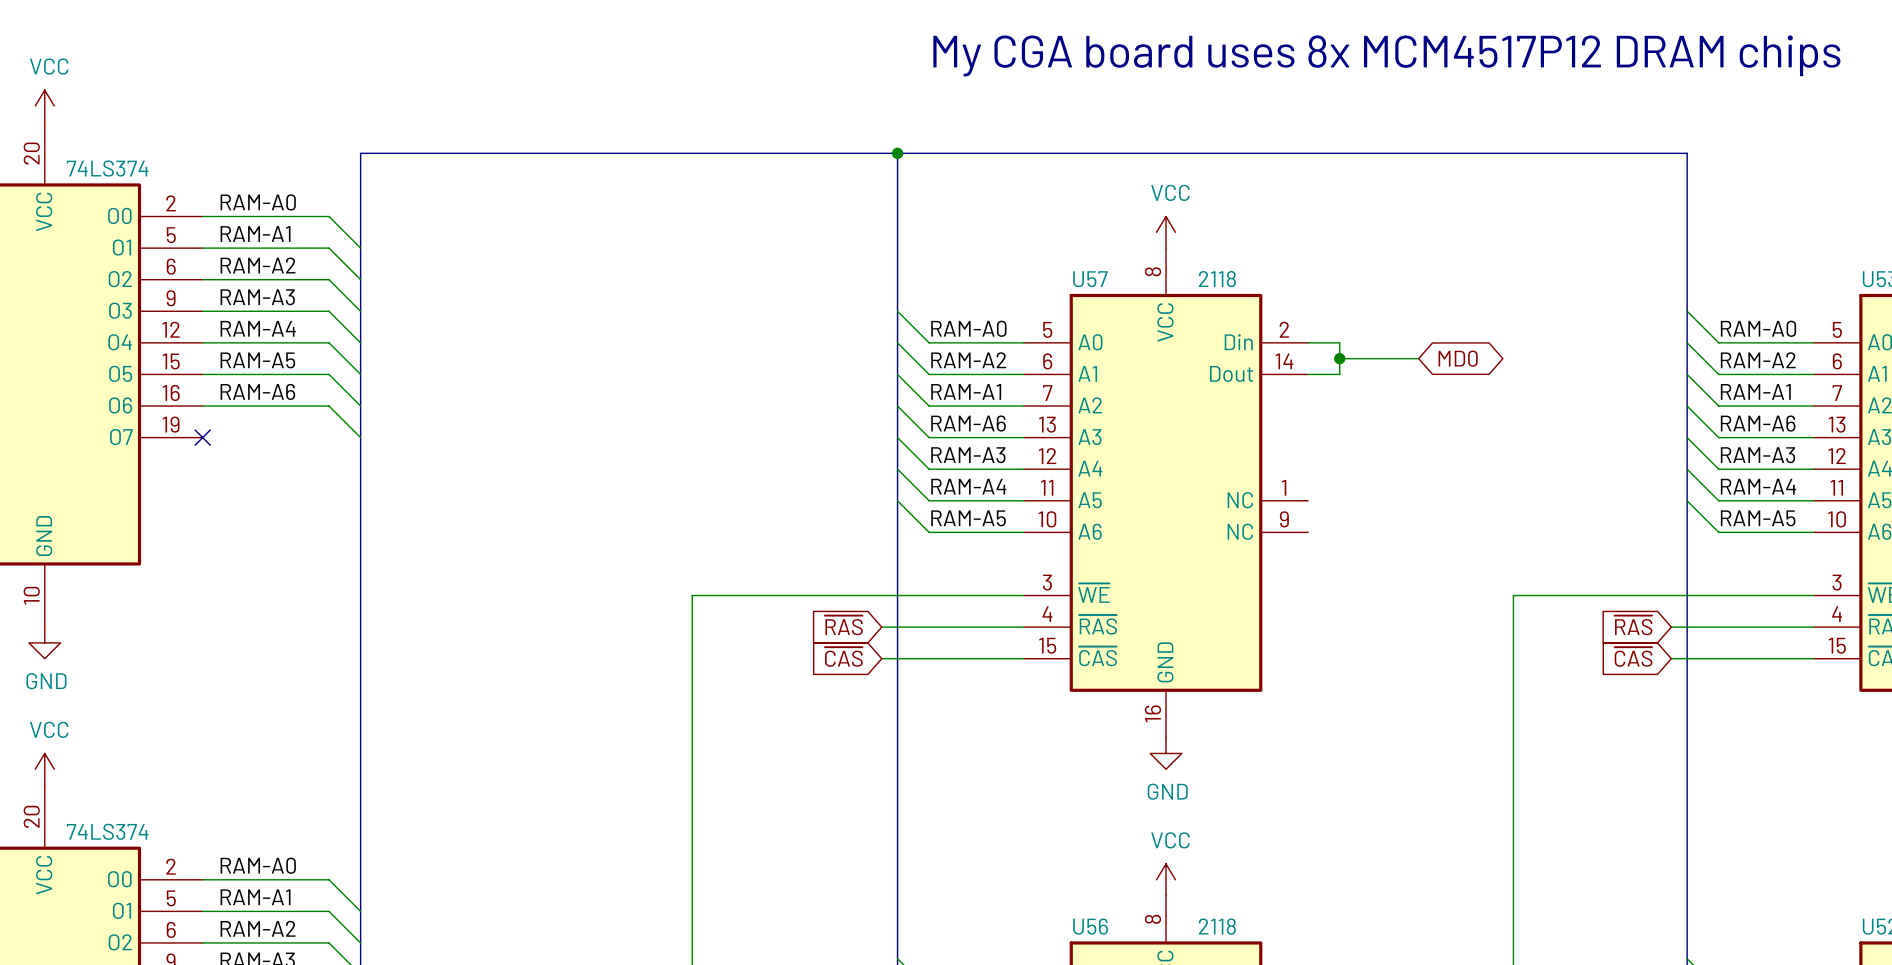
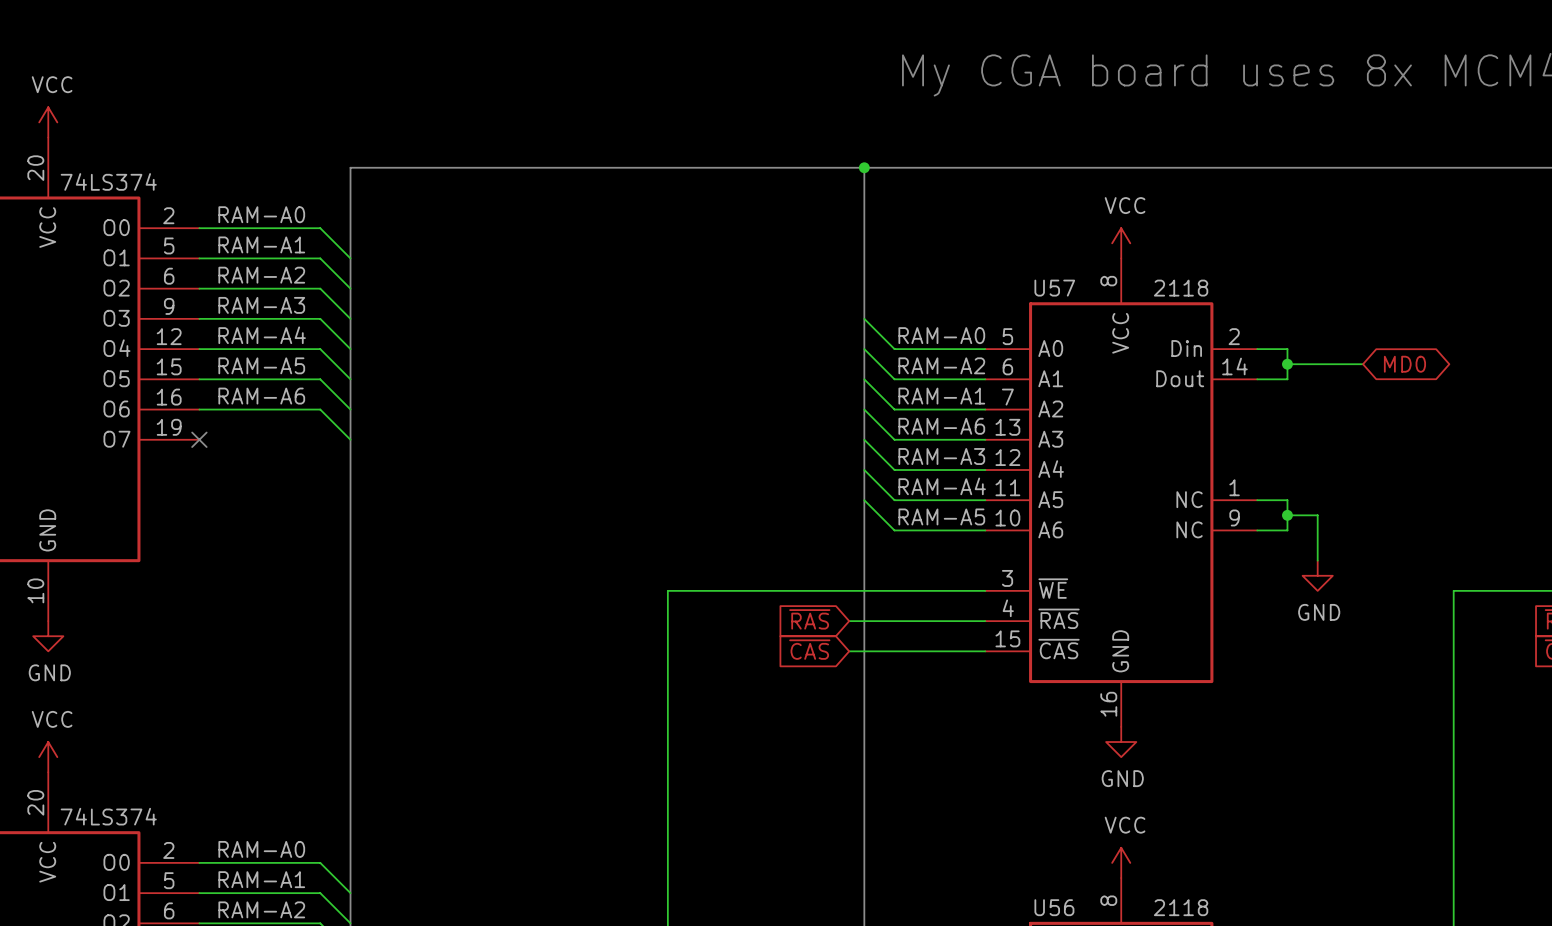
wire: none -> (1257, 500) (1287, 500) (1287, 530) (1257, 530)
wire: none -> (1287, 515) (1317, 515) (1317, 560)
junction: none -> (1287, 515)
power symbol: none -> GND (1317, 575)

